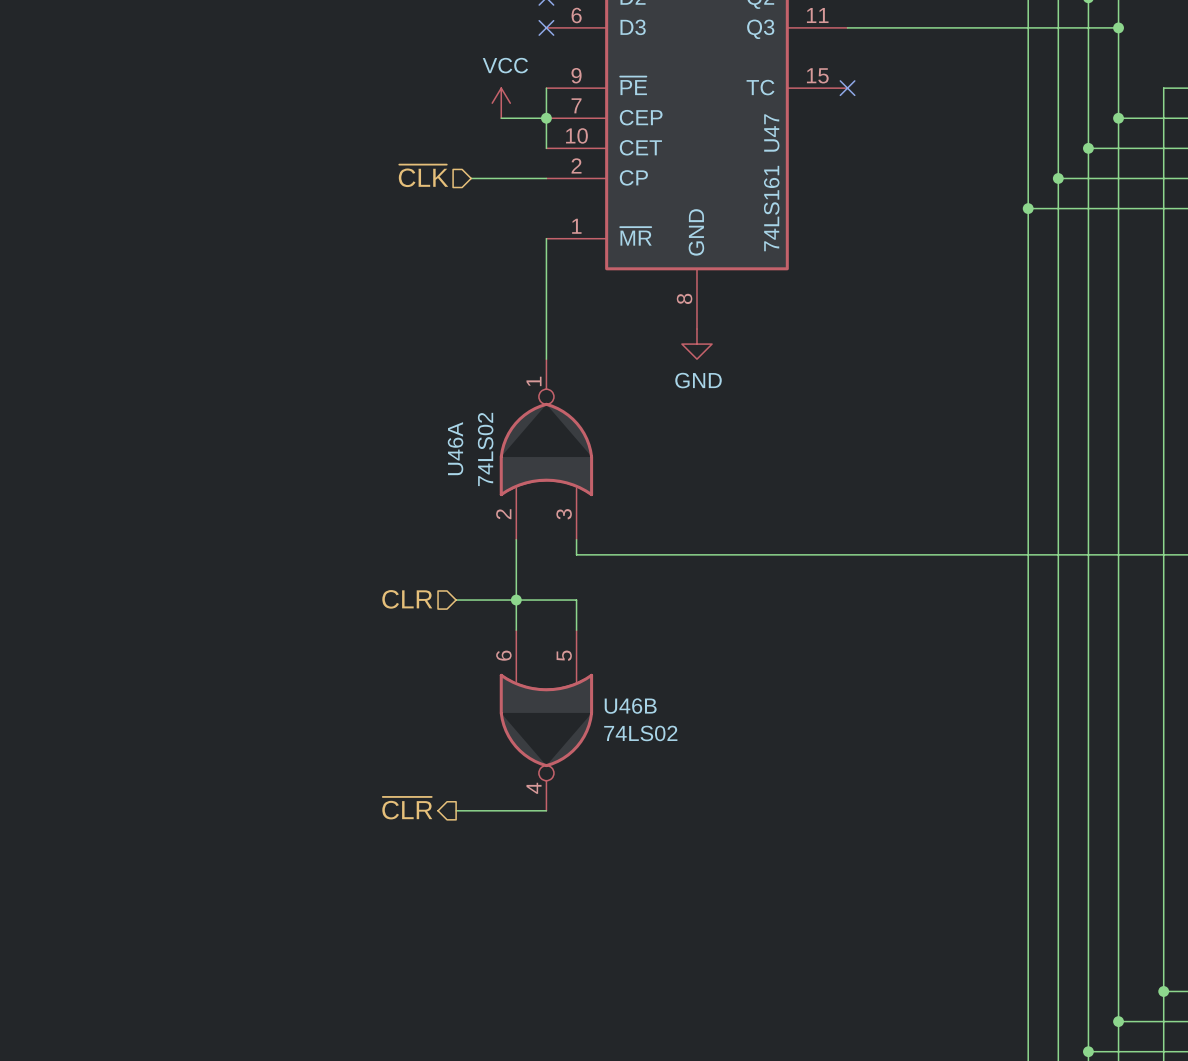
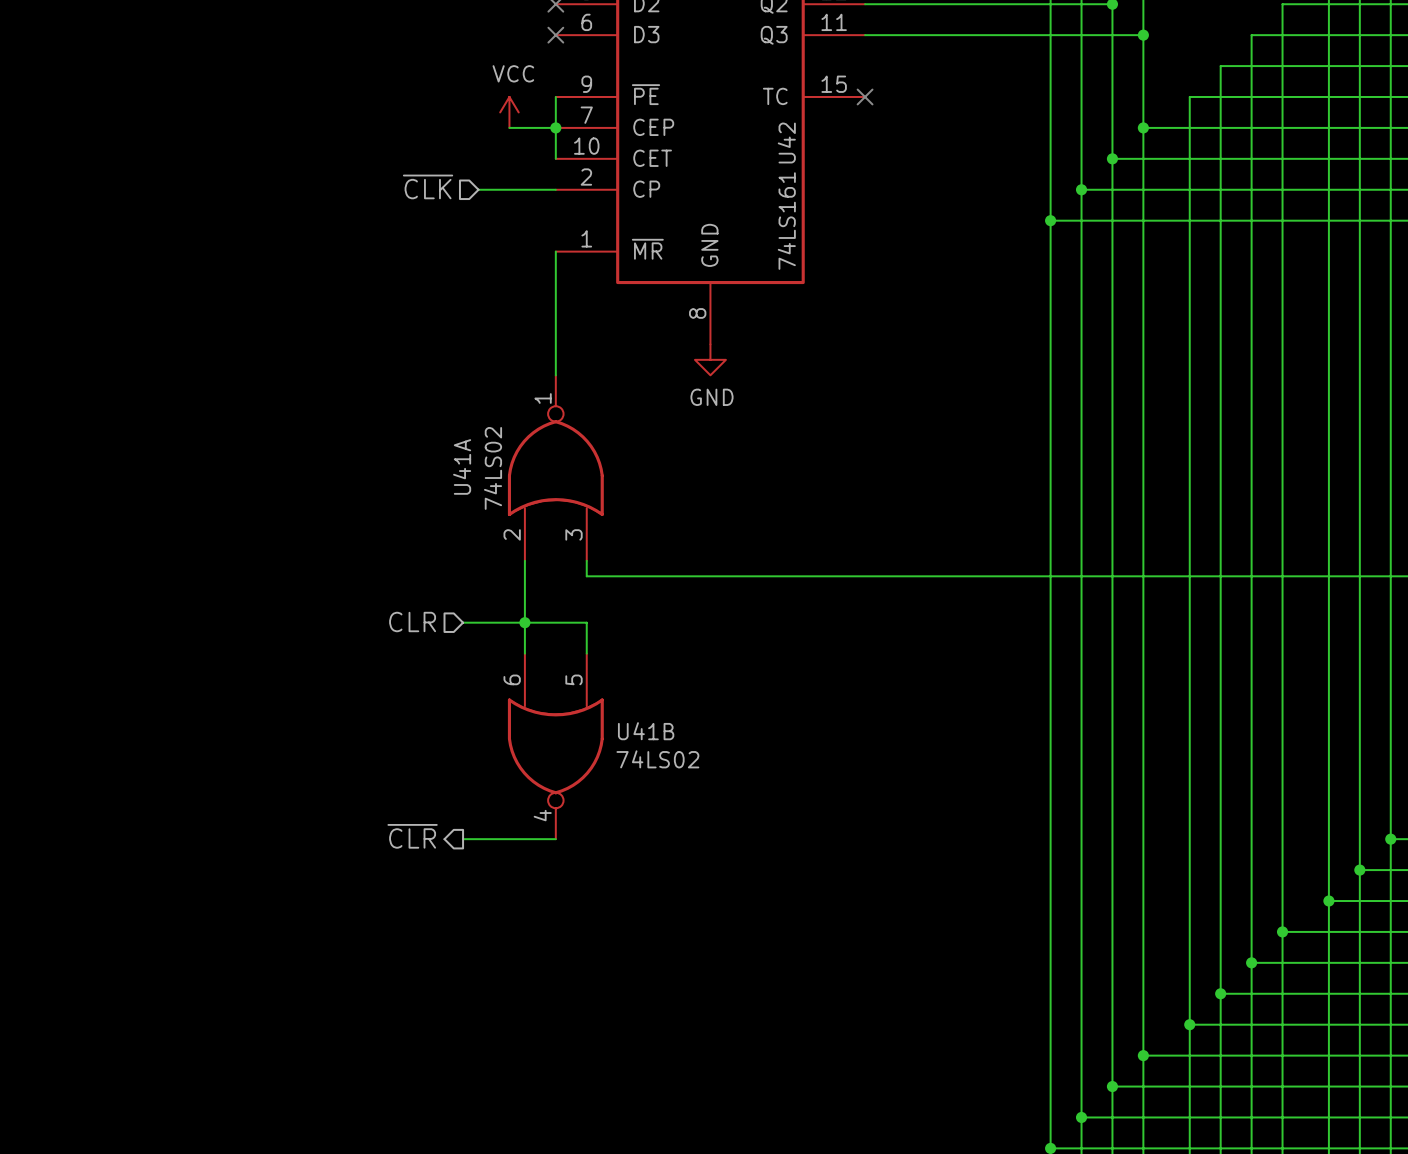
U47 name: U47 (771, 133) -> U42 (786, 143)
U46A name: U46A (455, 448) -> U41A (462, 466)
U46B name: U46B (630, 706) -> U41B (646, 731)

